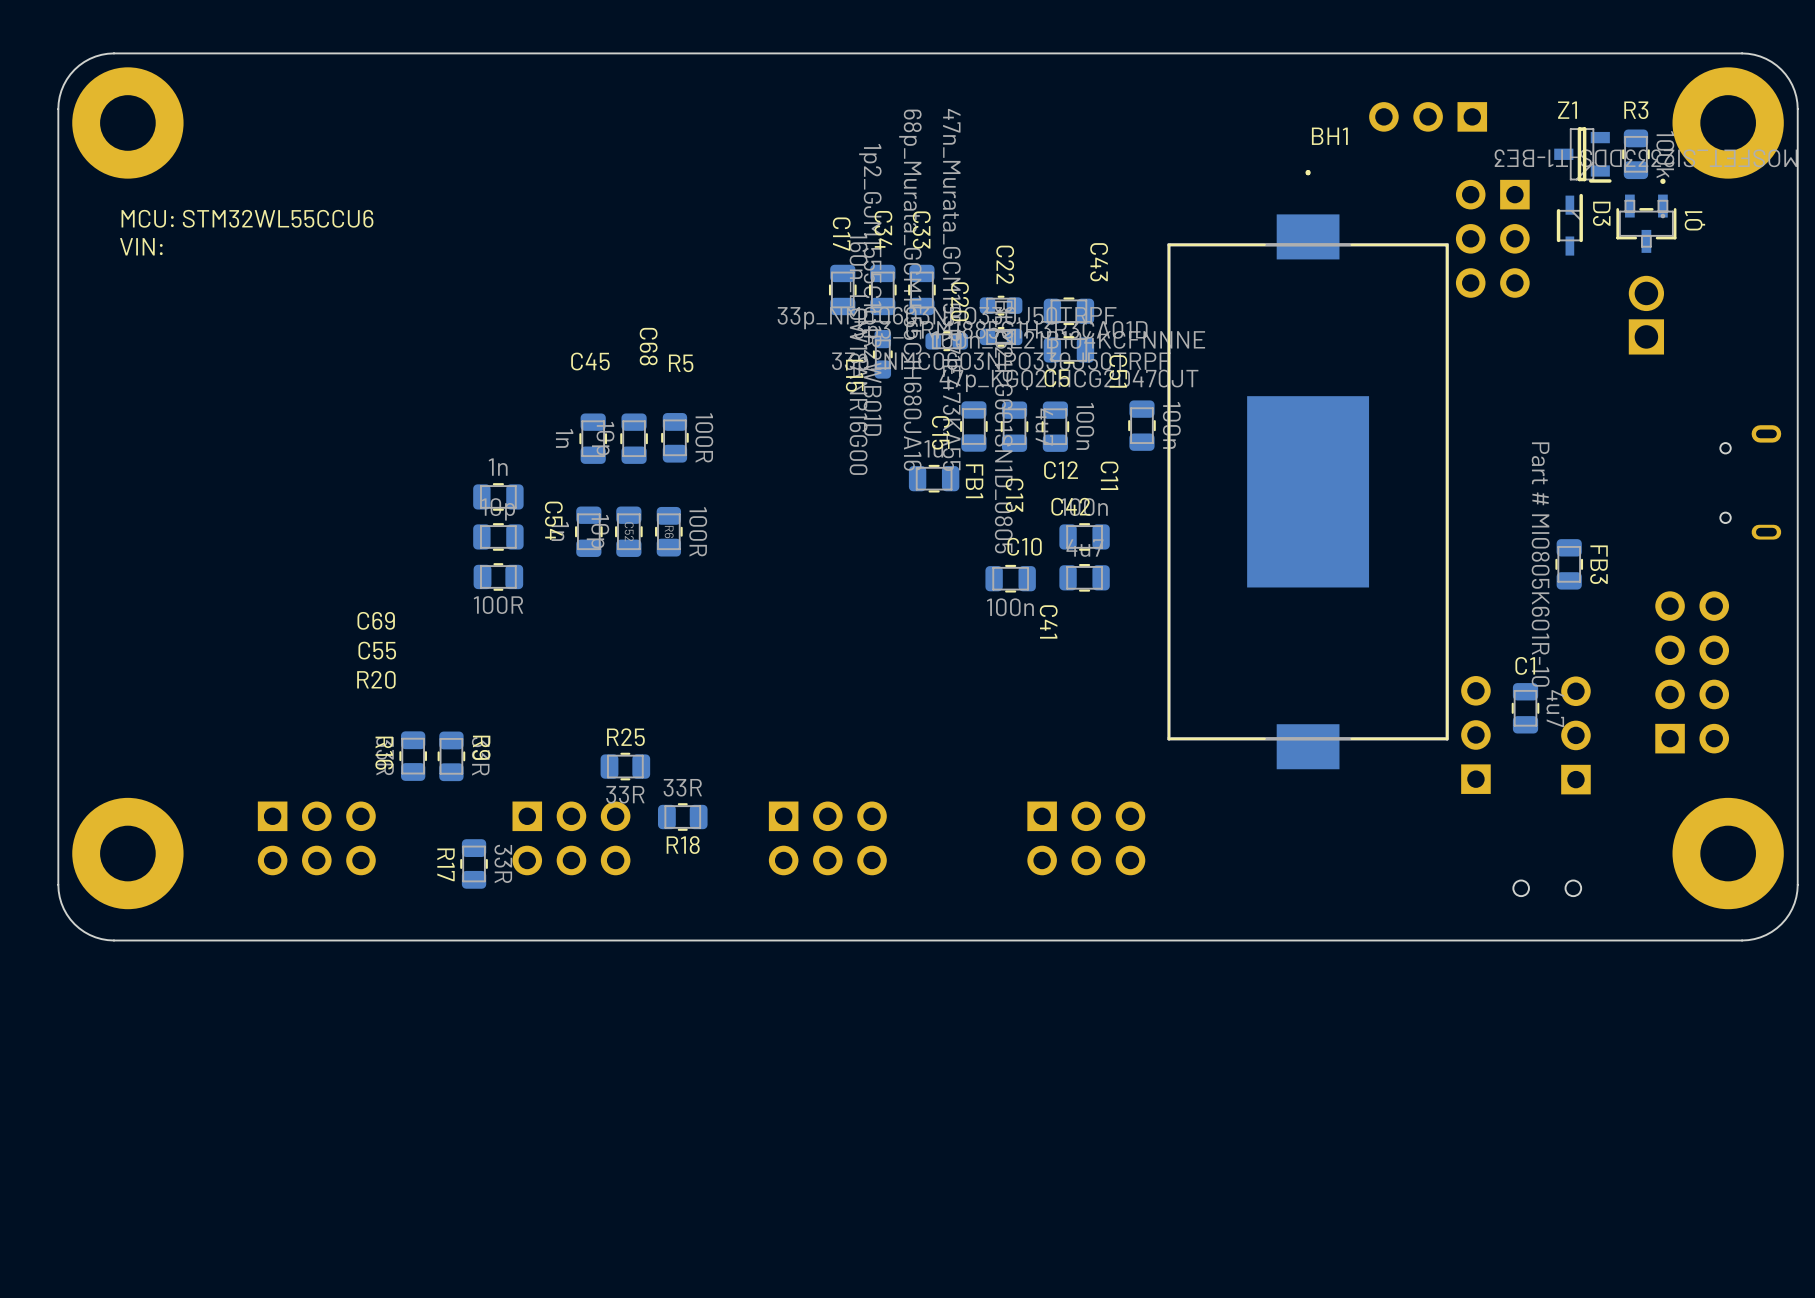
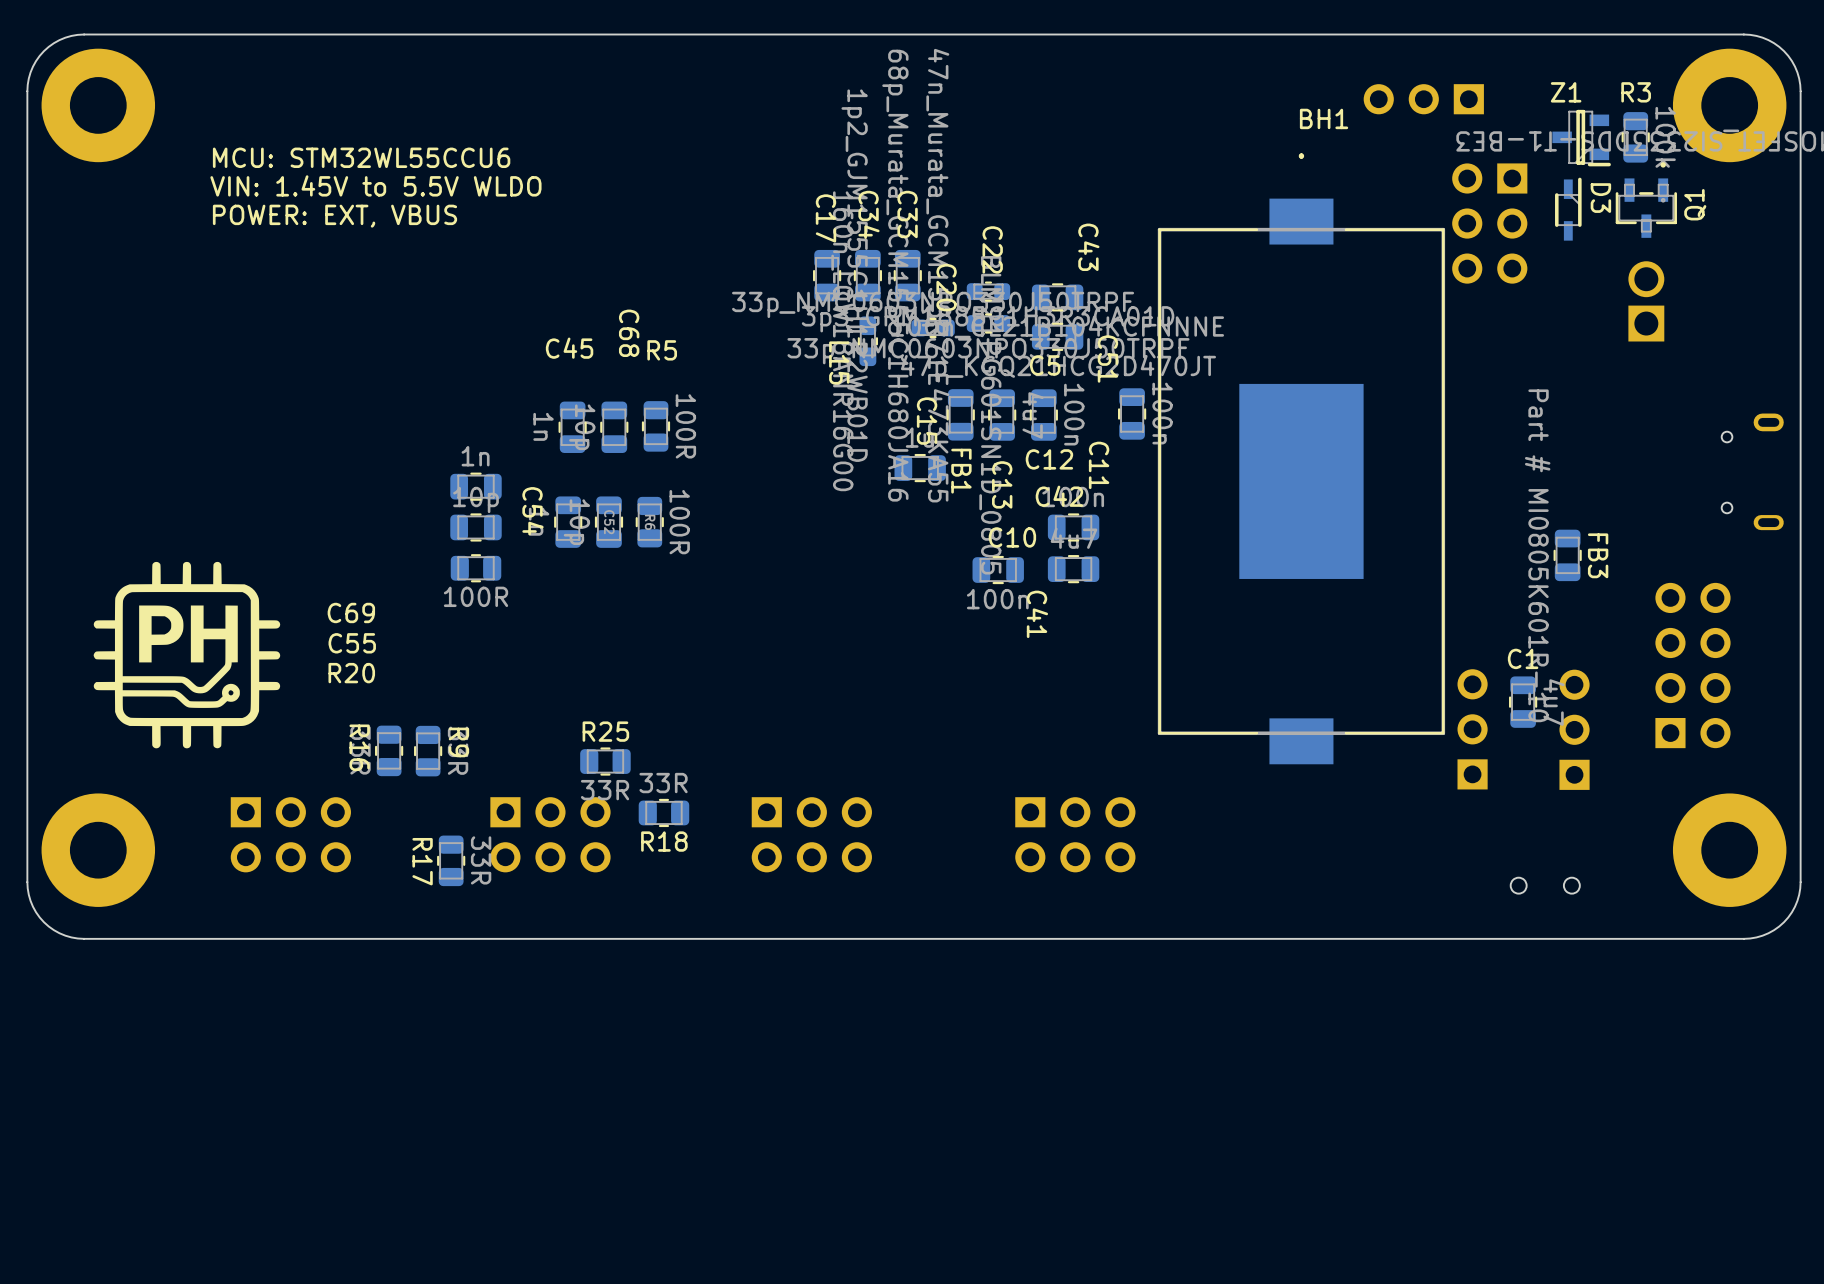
text: none -> VIN: 1.45V to 5.5V WLDO (375, 185)
text position: MCU: STM32WL55CCU6 (247, 218) -> MCU: STM32WL55CCU6 (361, 157)
text: none -> POWER: EXT, VBUS (334, 216)
text: VIN: (141, 246) -> none
drawing: none -> [93, 561, 281, 749]

